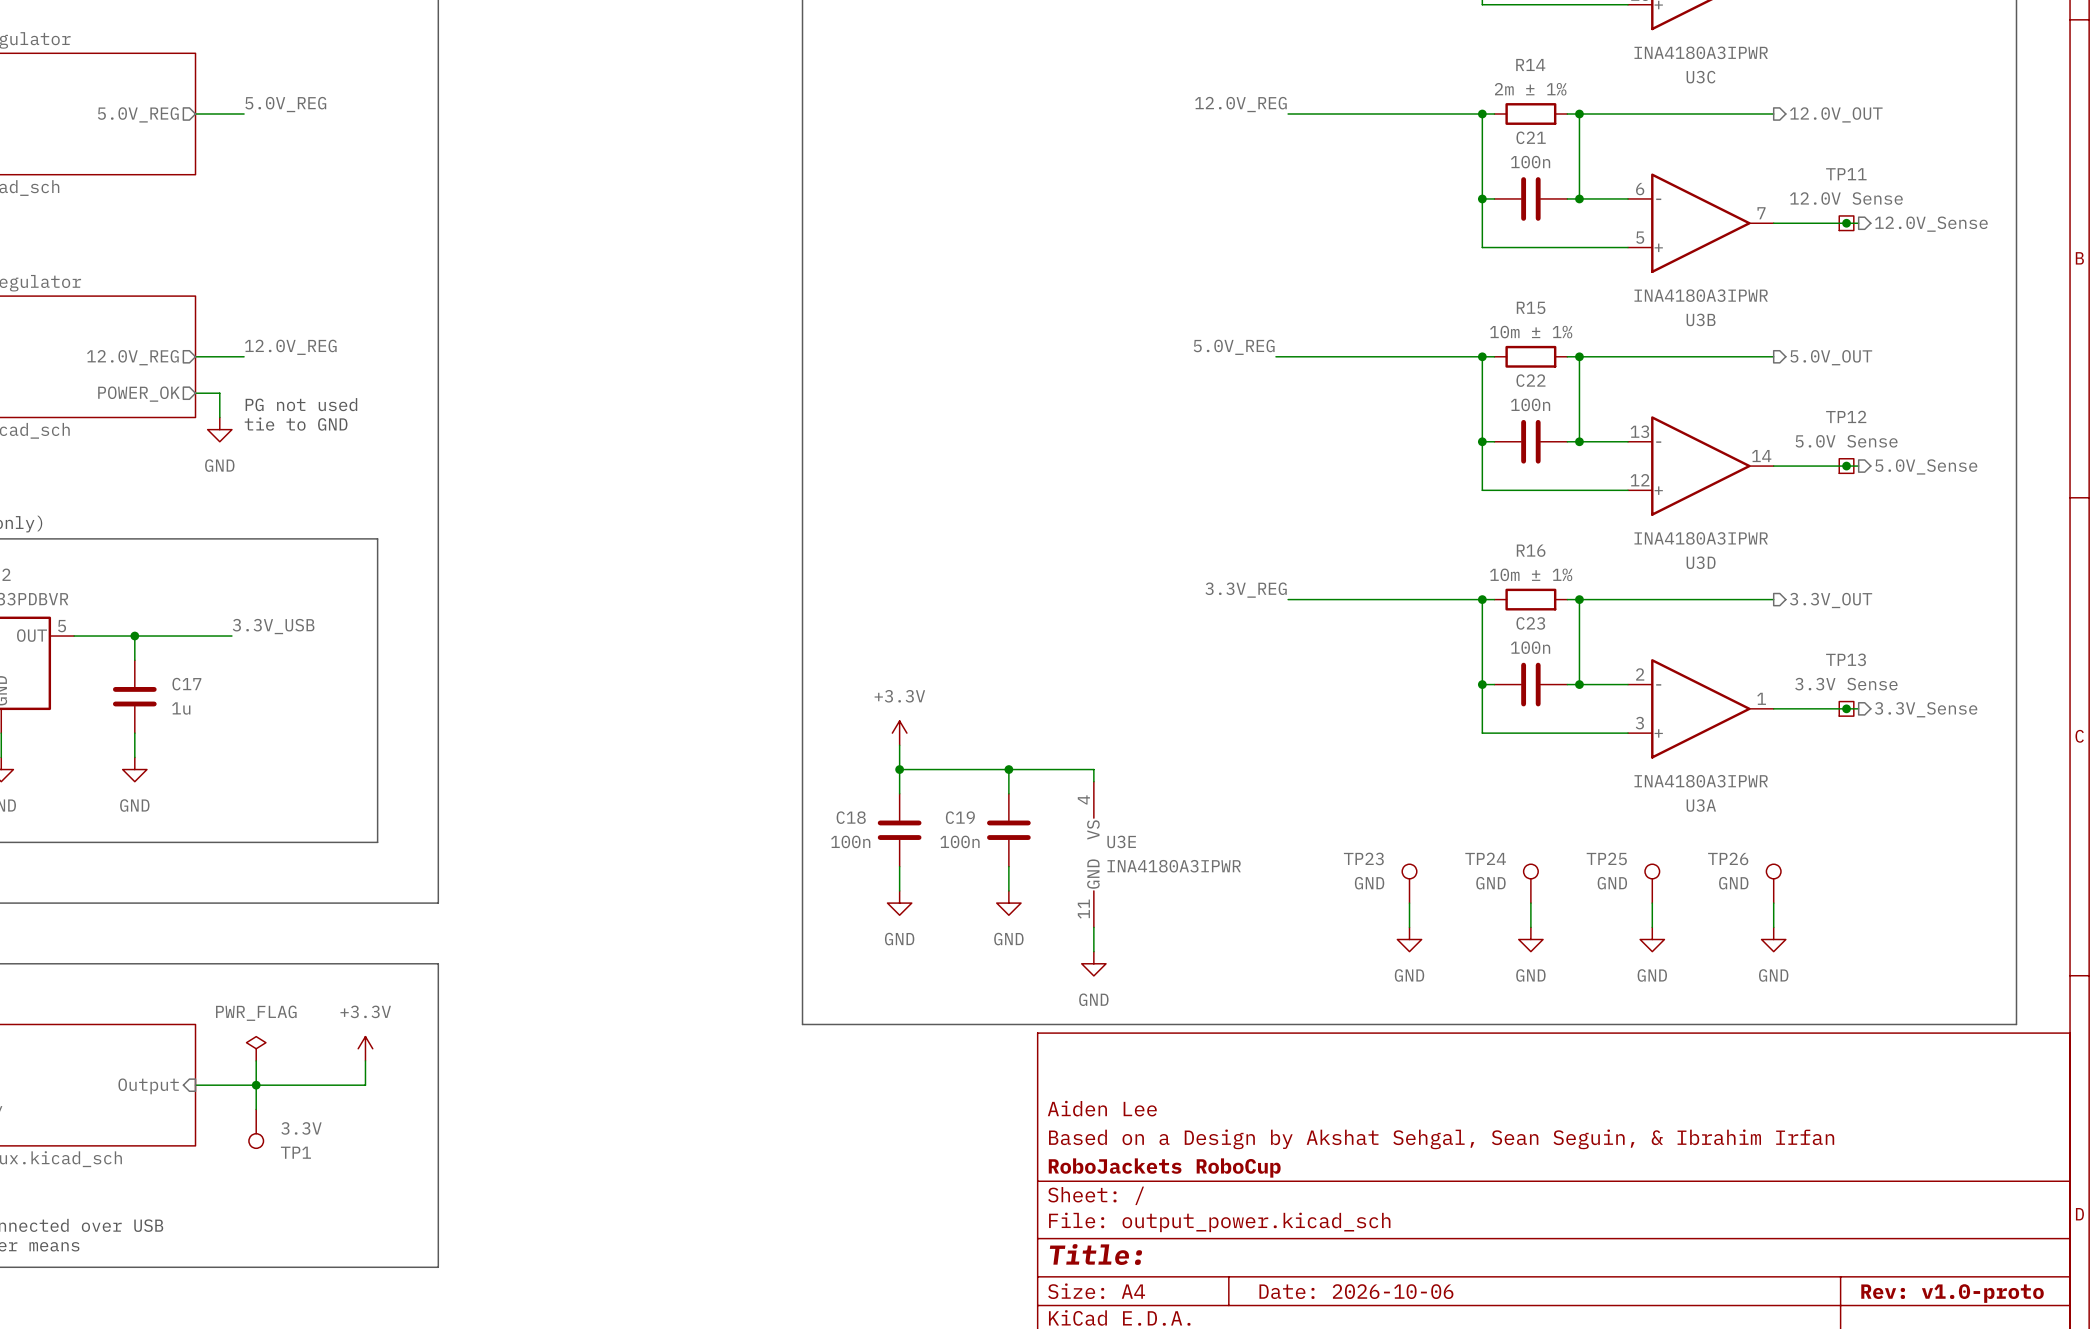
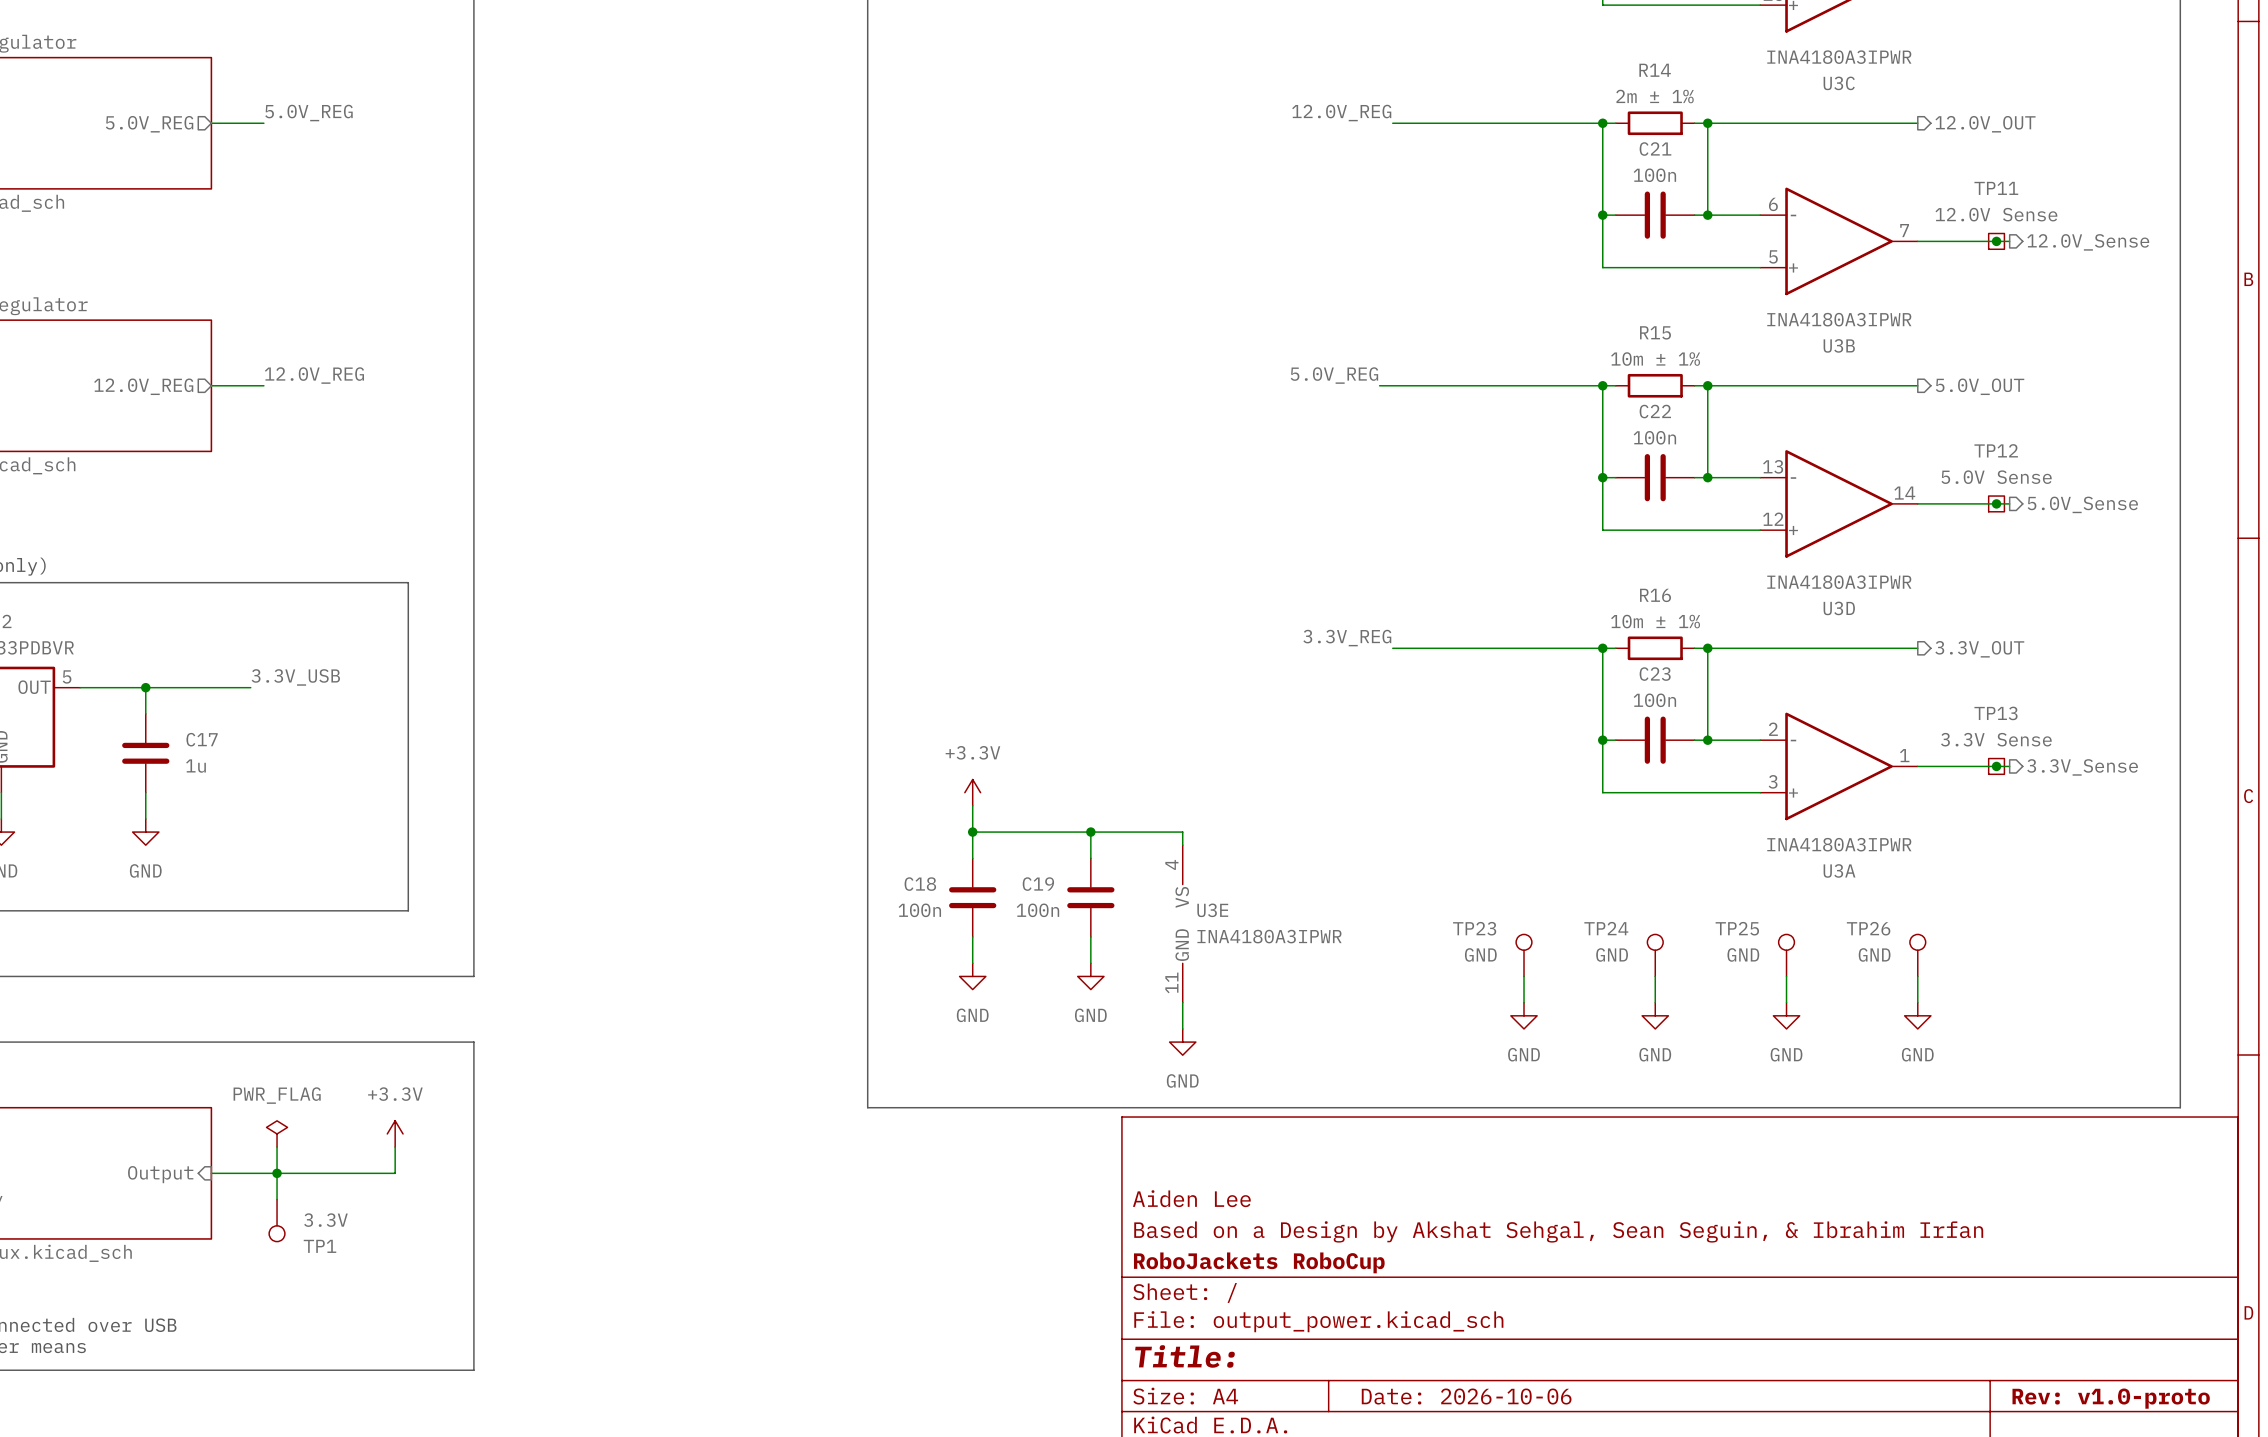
wire: (195, 393) (219, 393) (219, 417) -> none
sheet pin: POWER_OK (138, 394) -> none
text: PG not used (301, 404) -> none
text: tie to GND (296, 424) -> none
power symbol: GND (219, 429) -> none

